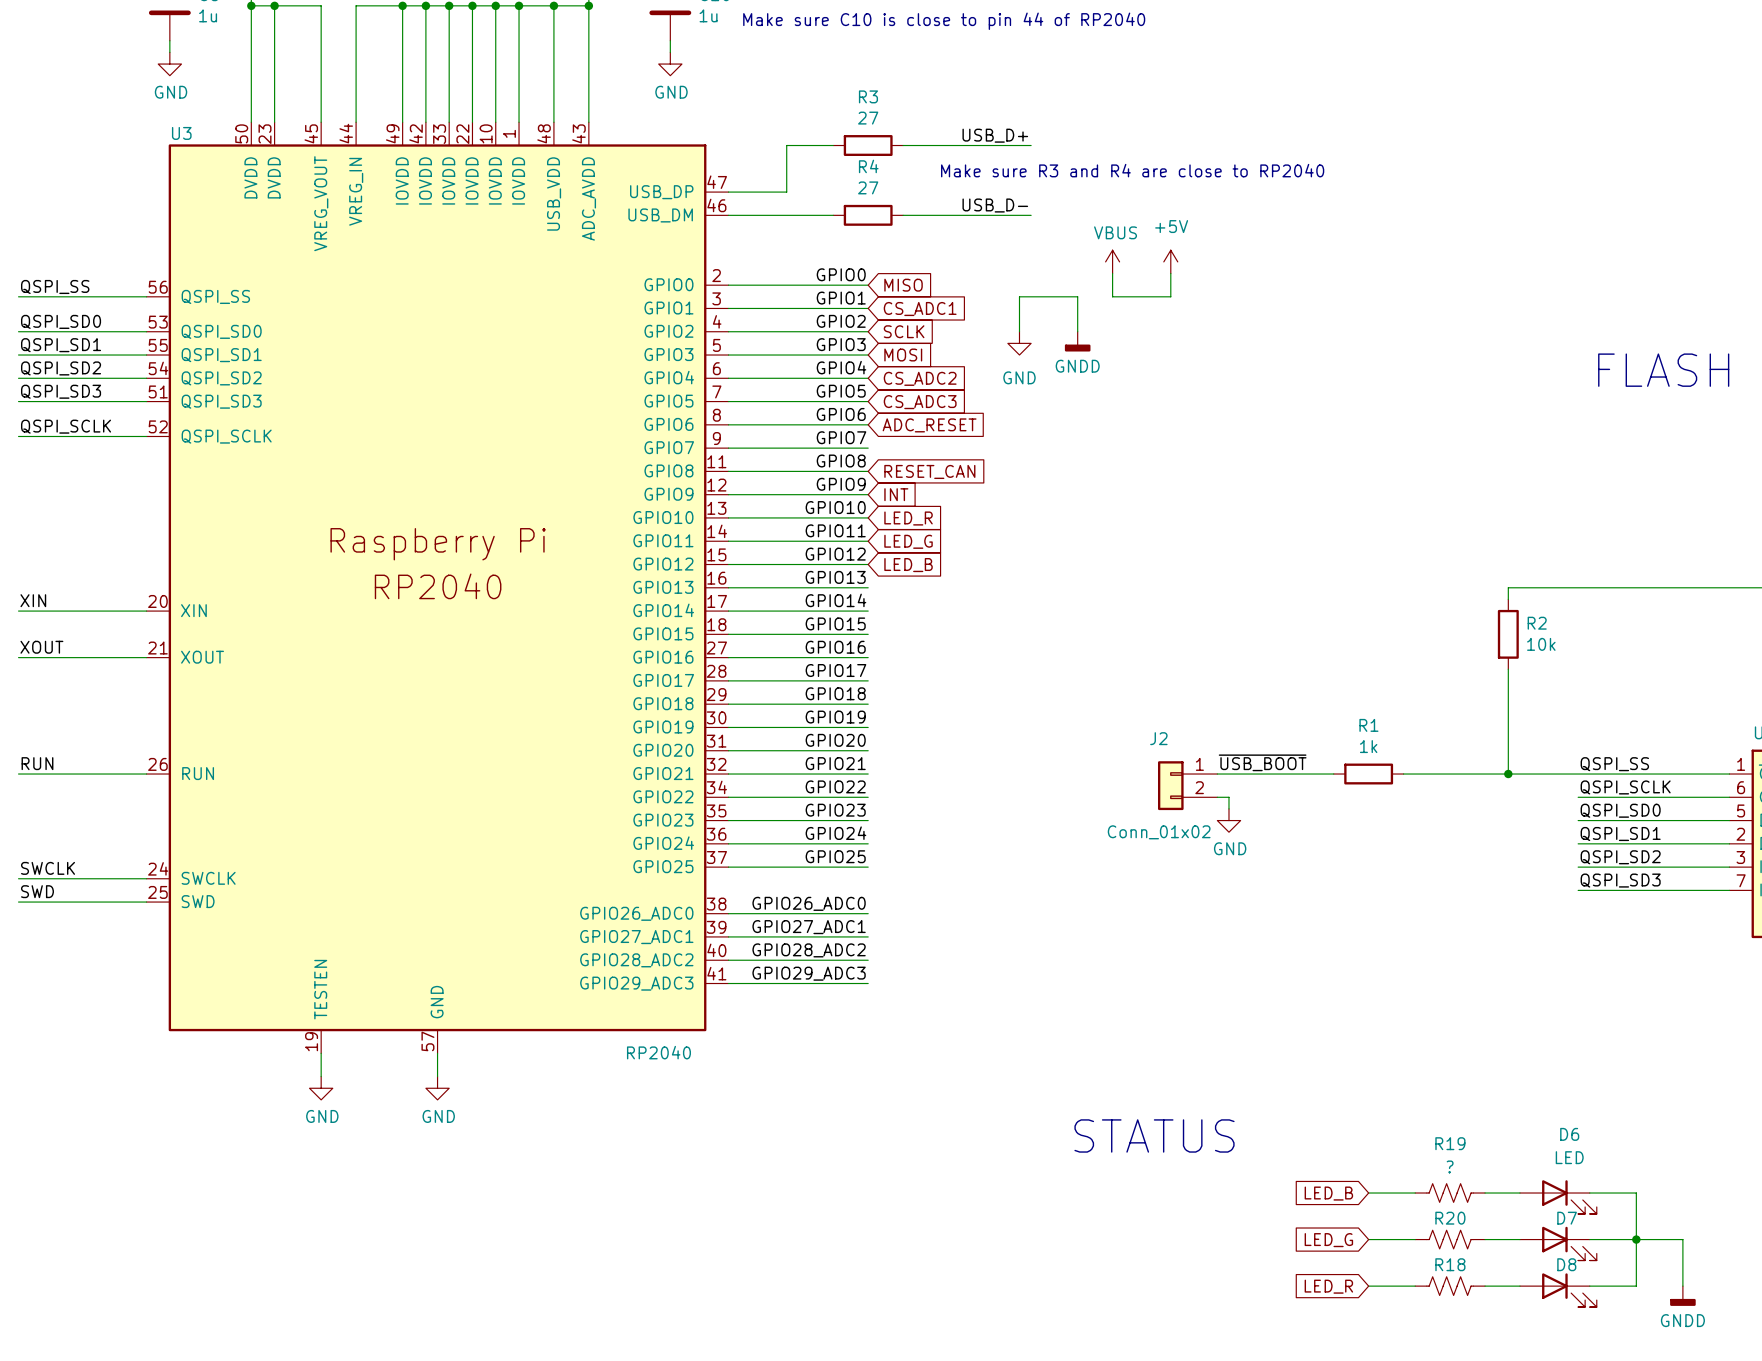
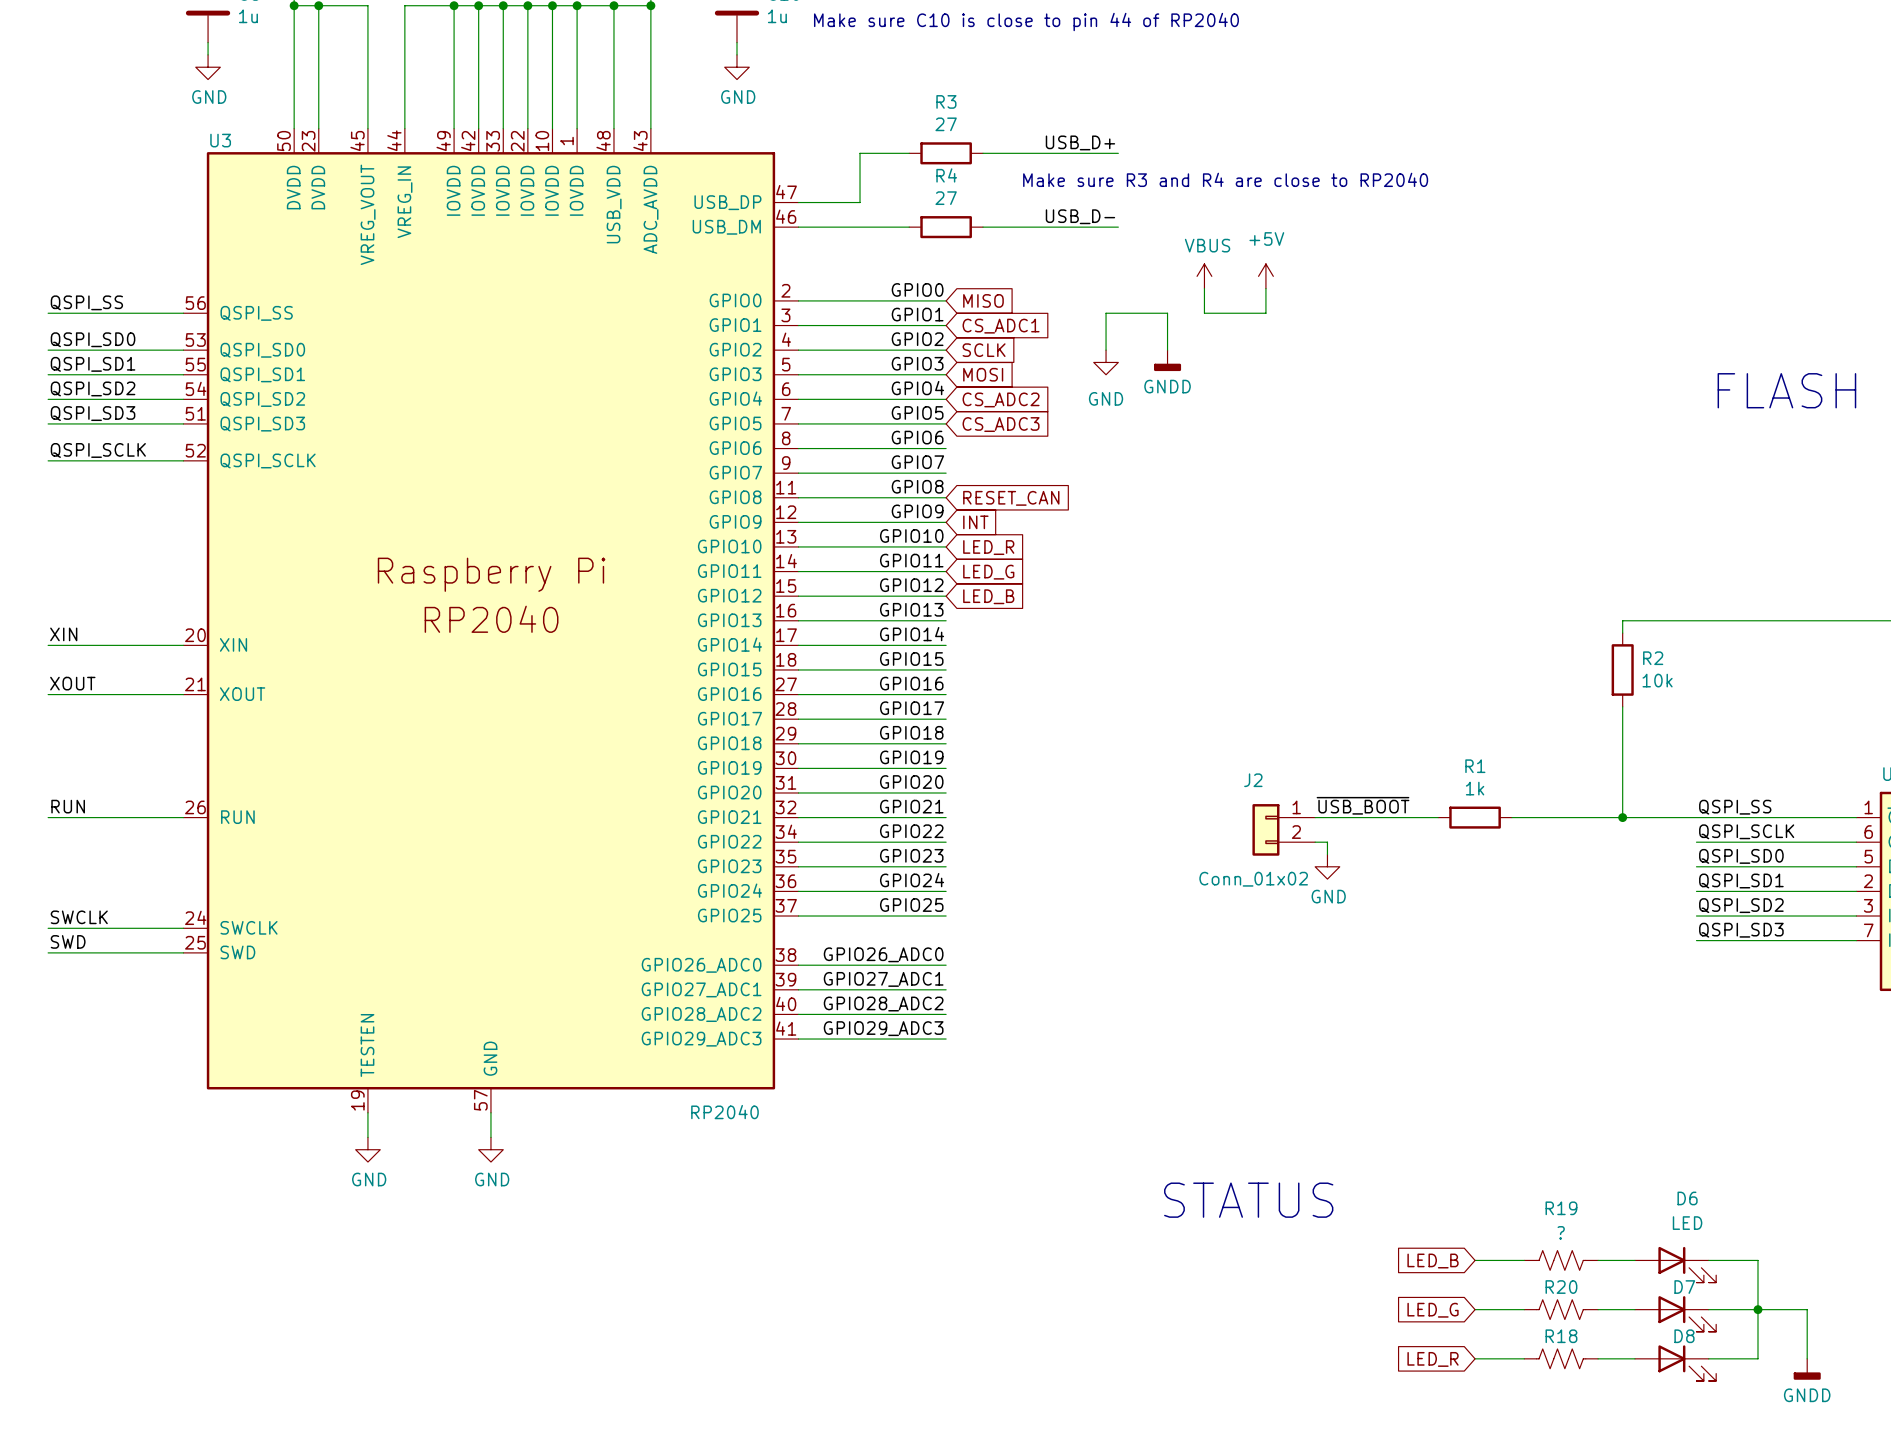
global label: ADC_RESET (929, 425) -> none

